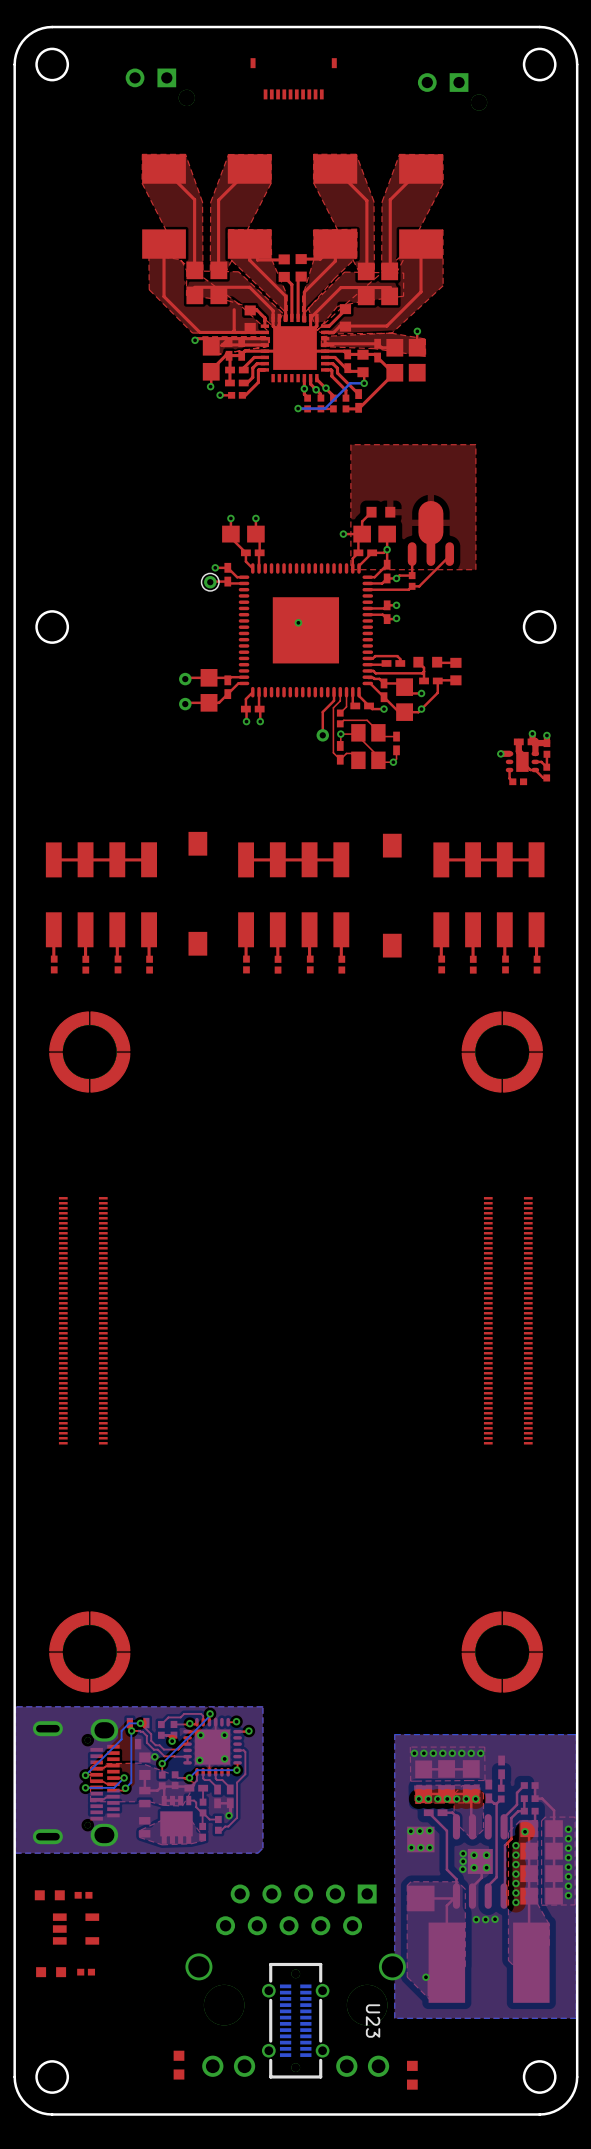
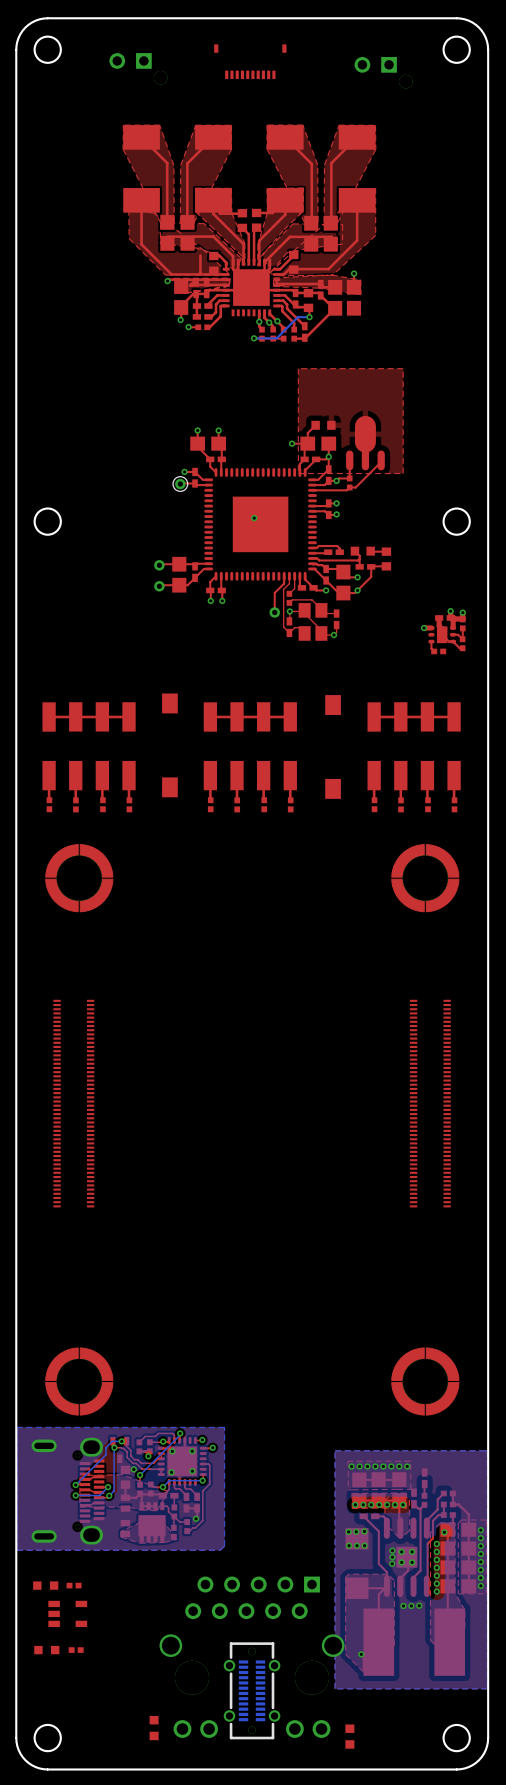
U23 name: U23 (373, 2021) -> none

